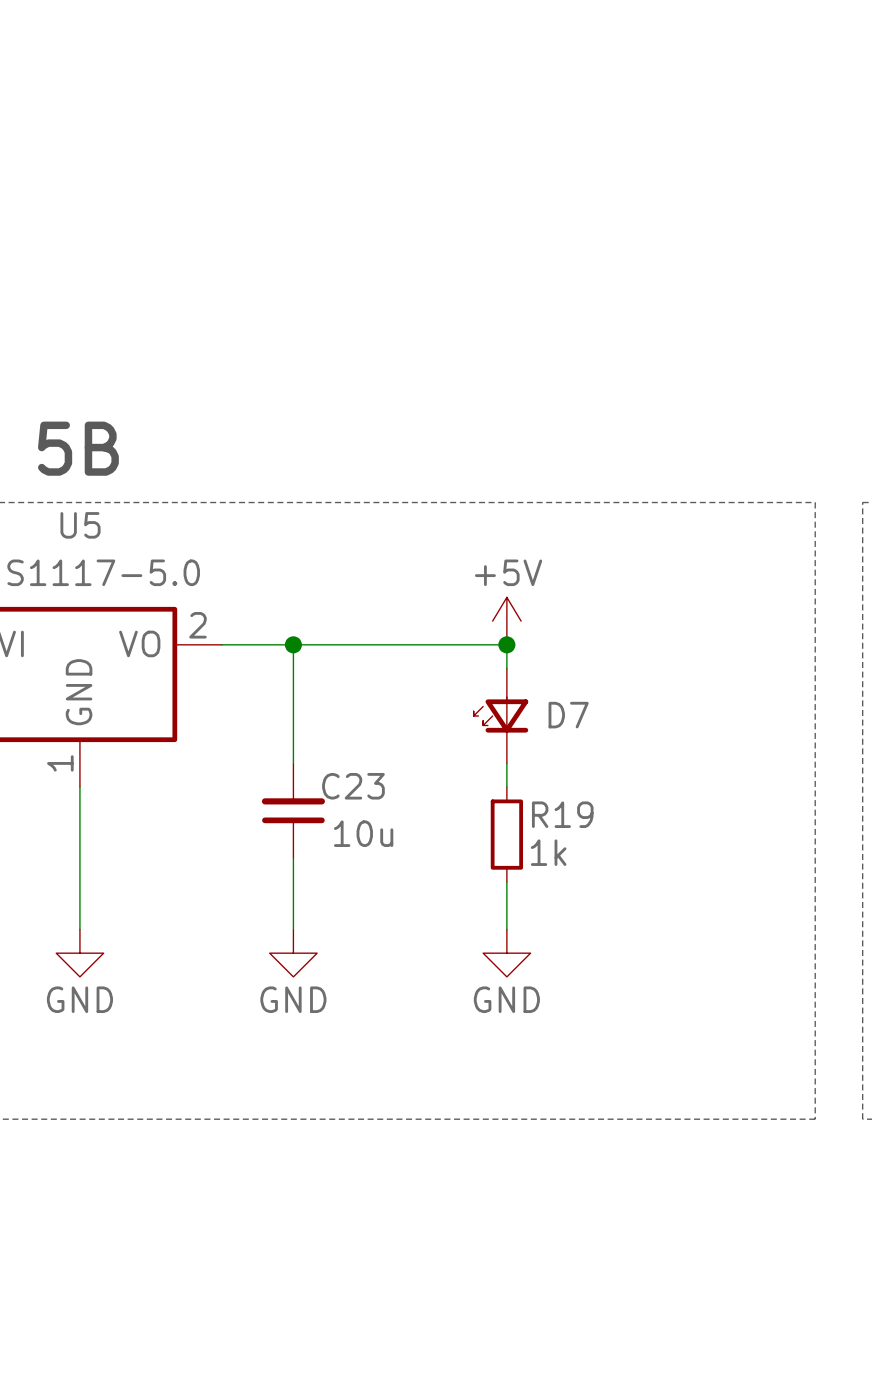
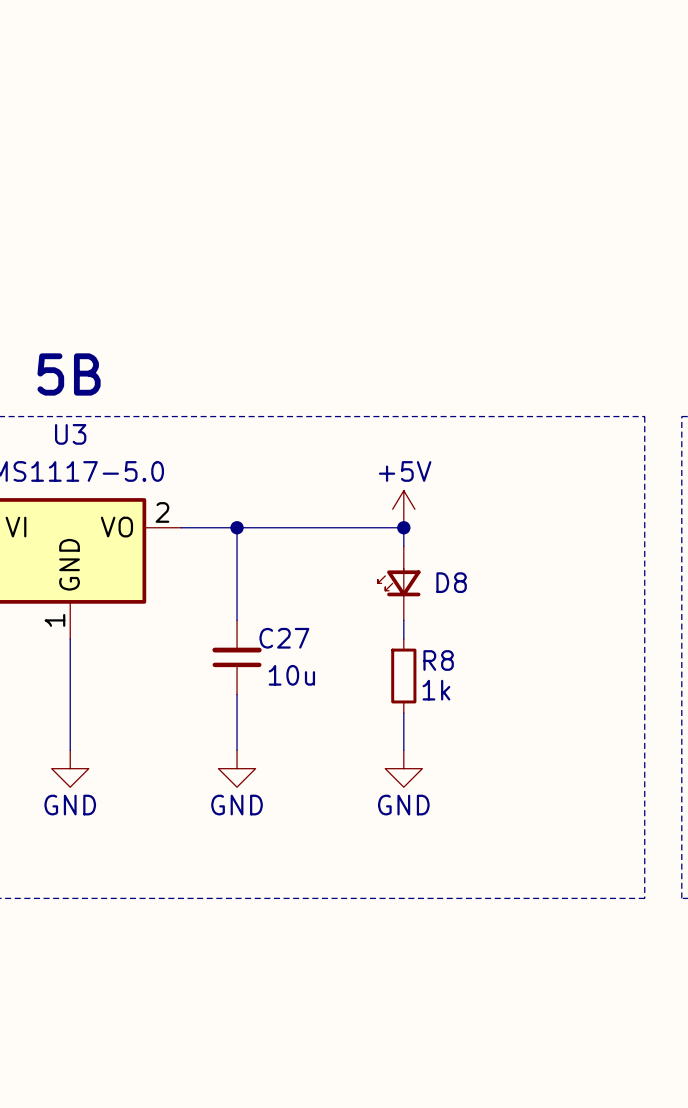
U5 name: U5 (80, 525) -> U3 (70, 434)
D7 name: D7 (568, 715) -> D8 (451, 582)
C23 name: C23 (353, 786) -> C27 (284, 638)
R19 name: R19 (562, 814) -> R8 (438, 660)

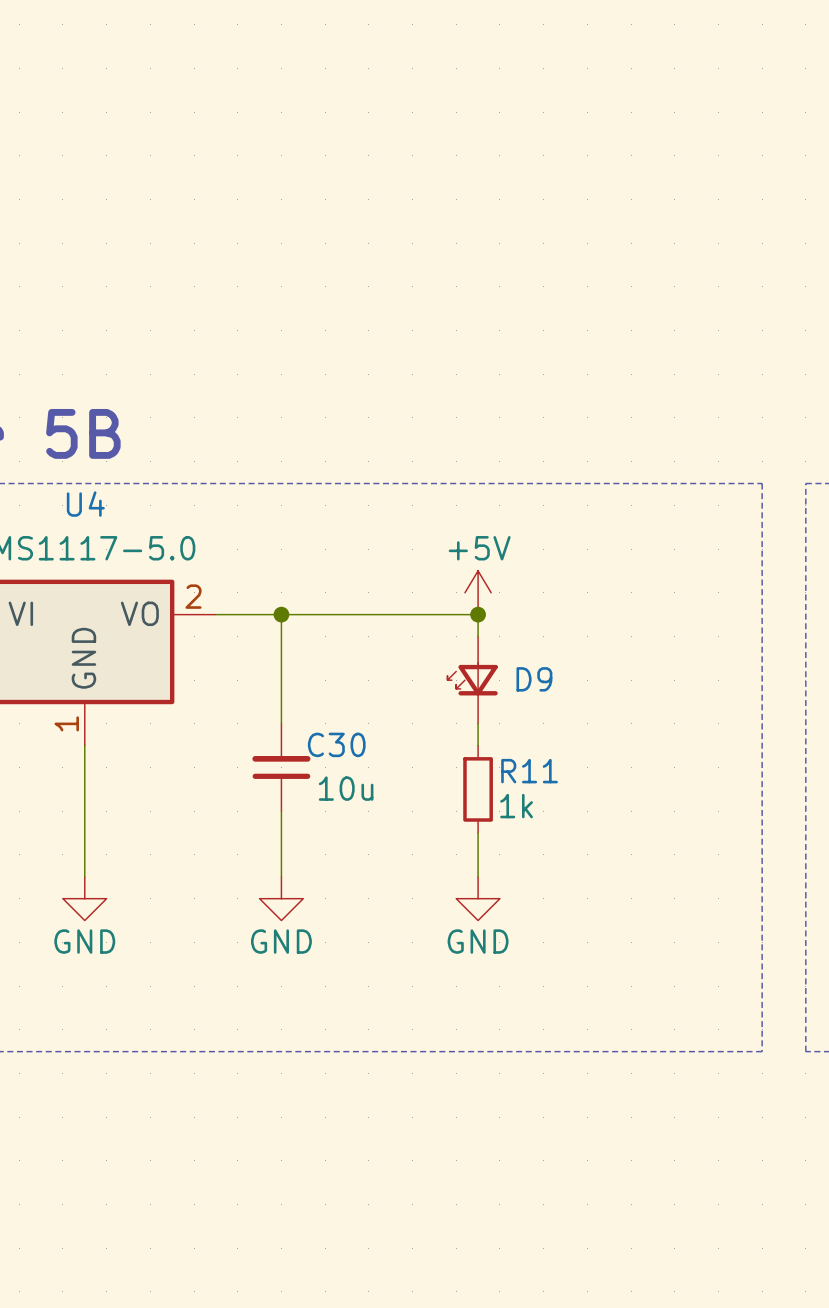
U3 name: U3 (70, 434) -> U4 (85, 504)
D8 name: D8 (451, 582) -> D9 (534, 679)
C27 name: C27 (284, 638) -> C30 (336, 744)
R8 name: R8 (438, 660) -> R11 (529, 771)

